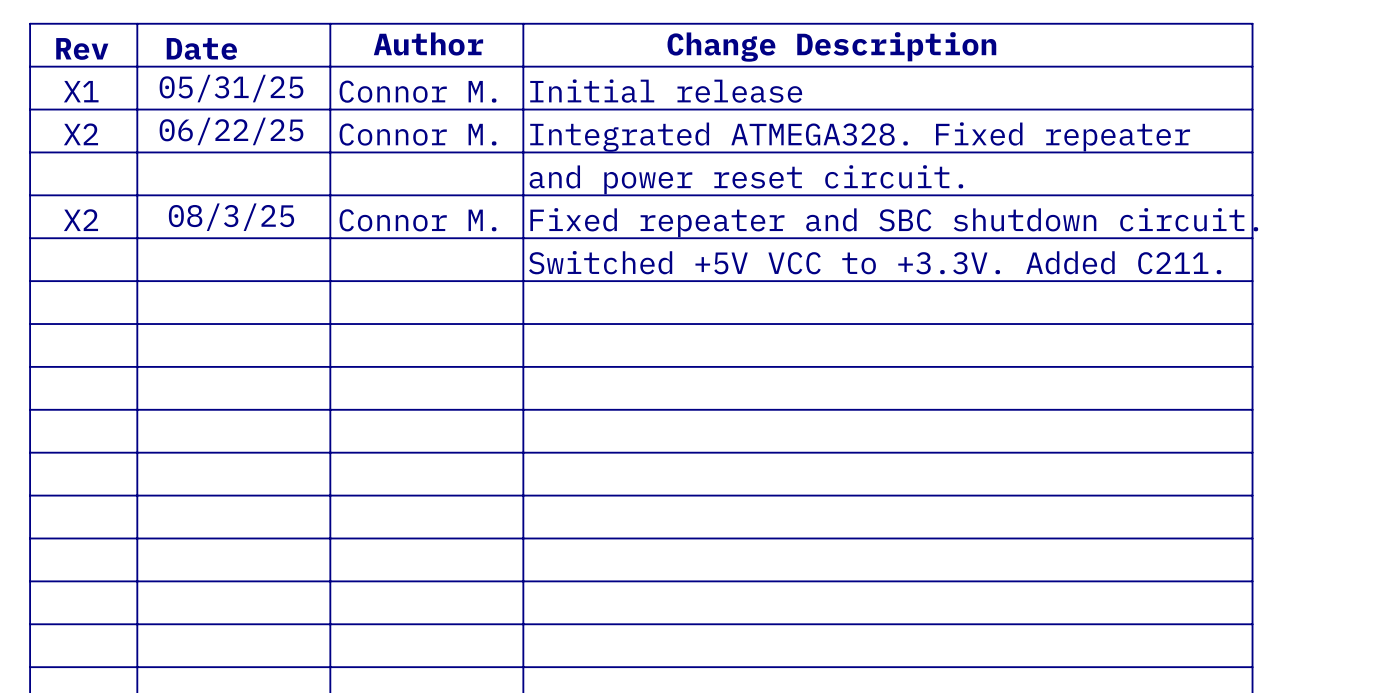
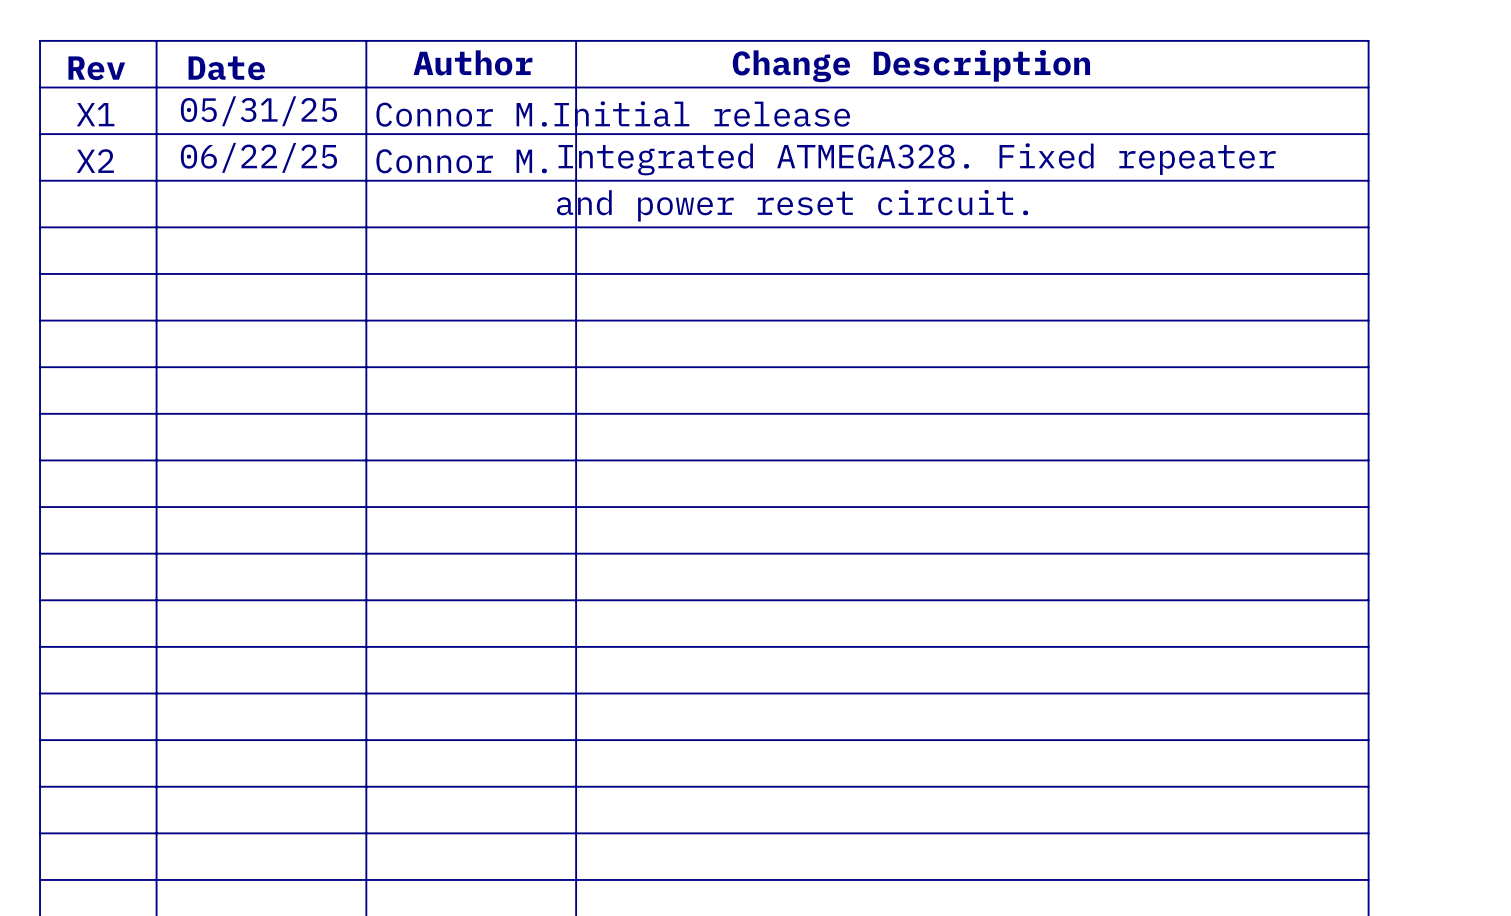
text position: Initial release (666, 91) -> Initial release (702, 114)
text position: Integrated ATMEGA328. Fixed repeater (860, 137) -> Integrated ATMEGA328. Fixed repeater (917, 159)
text position: and power reset circuit. (746, 179) -> and power reset circuit. (792, 205)
text: 08/3/25 (231, 217) -> none
text: X2 (80, 220) -> none
text: Connor M. (418, 220) -> none
text: Fixed repeater and SBC shutdown circuit. (894, 222) -> none
text: Switched +5V VCC to +3.3V. Added C211. (875, 262) -> none

